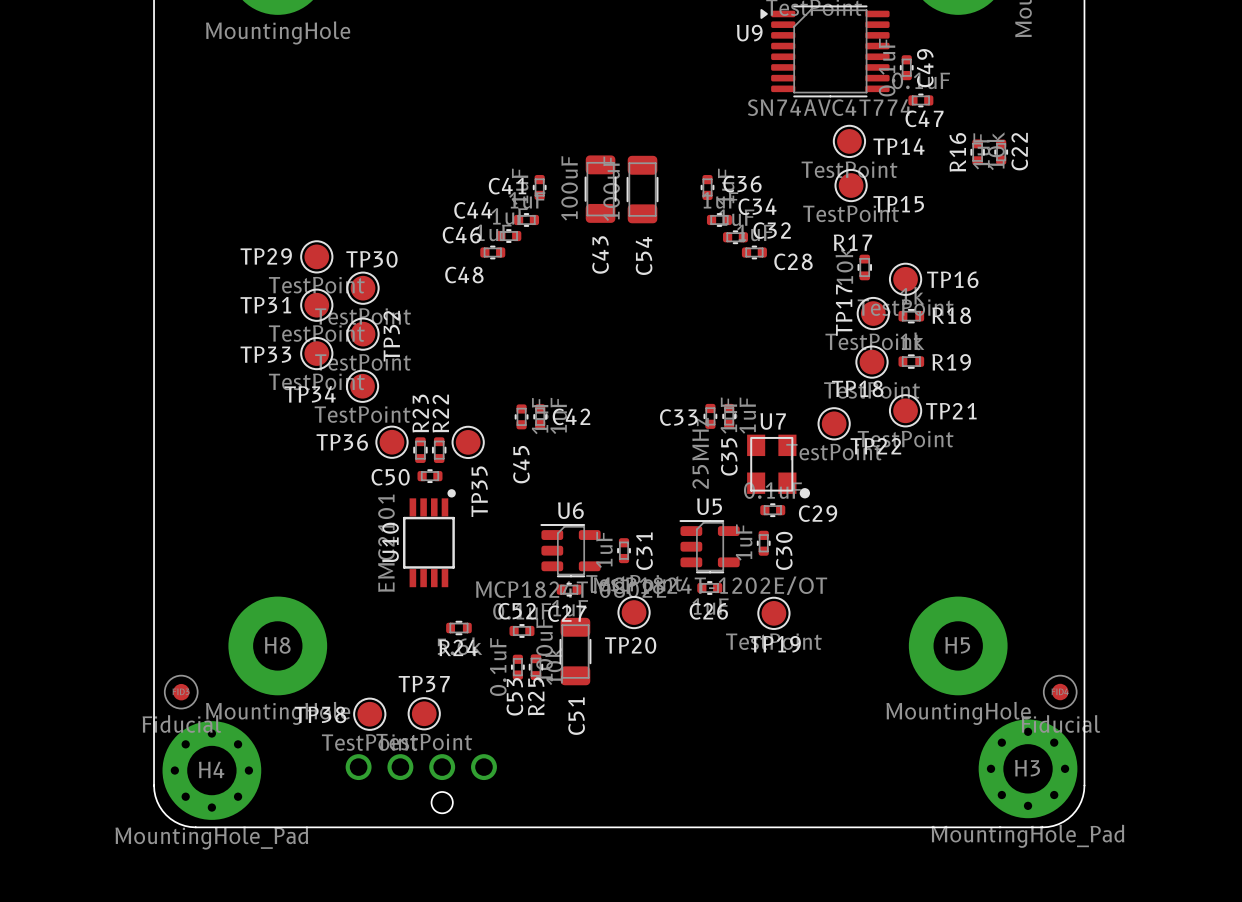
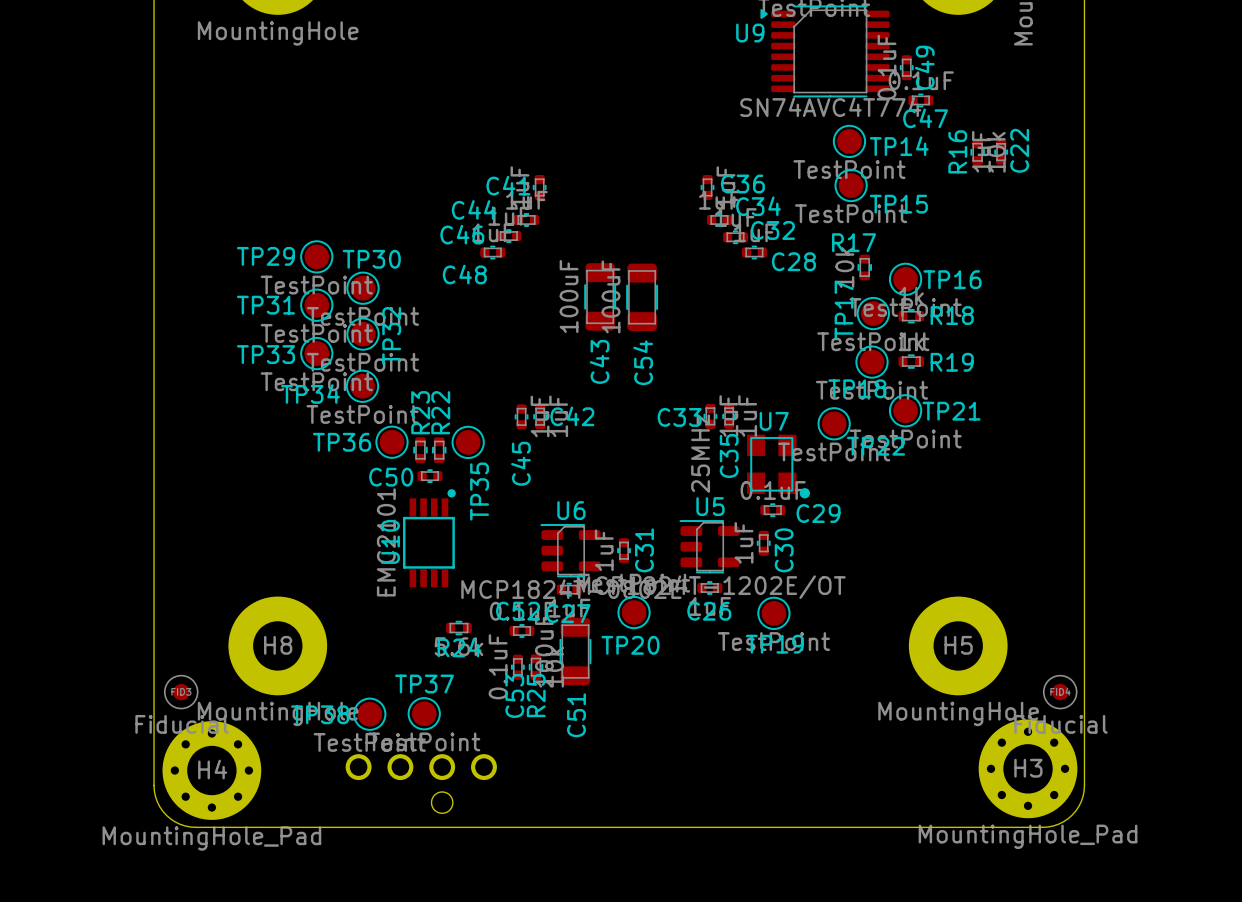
C43 position: (600, 189) -> (600, 296)
C54 position: (642, 189) -> (642, 297)

